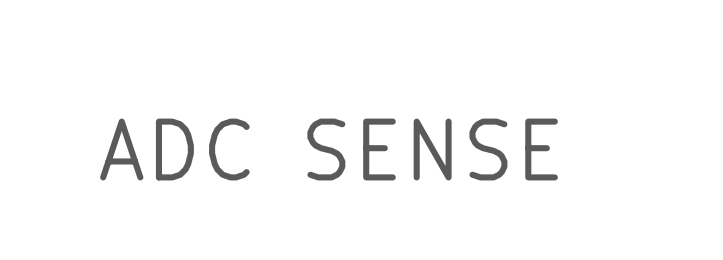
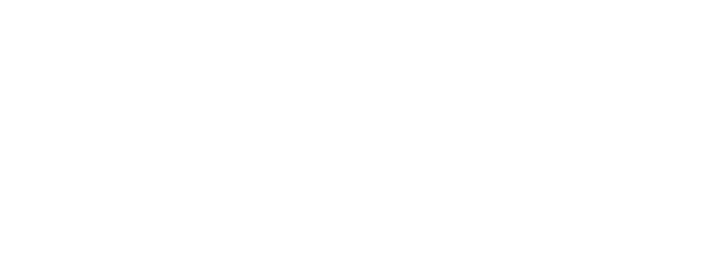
text: ADC SENSE (329, 149) -> none

